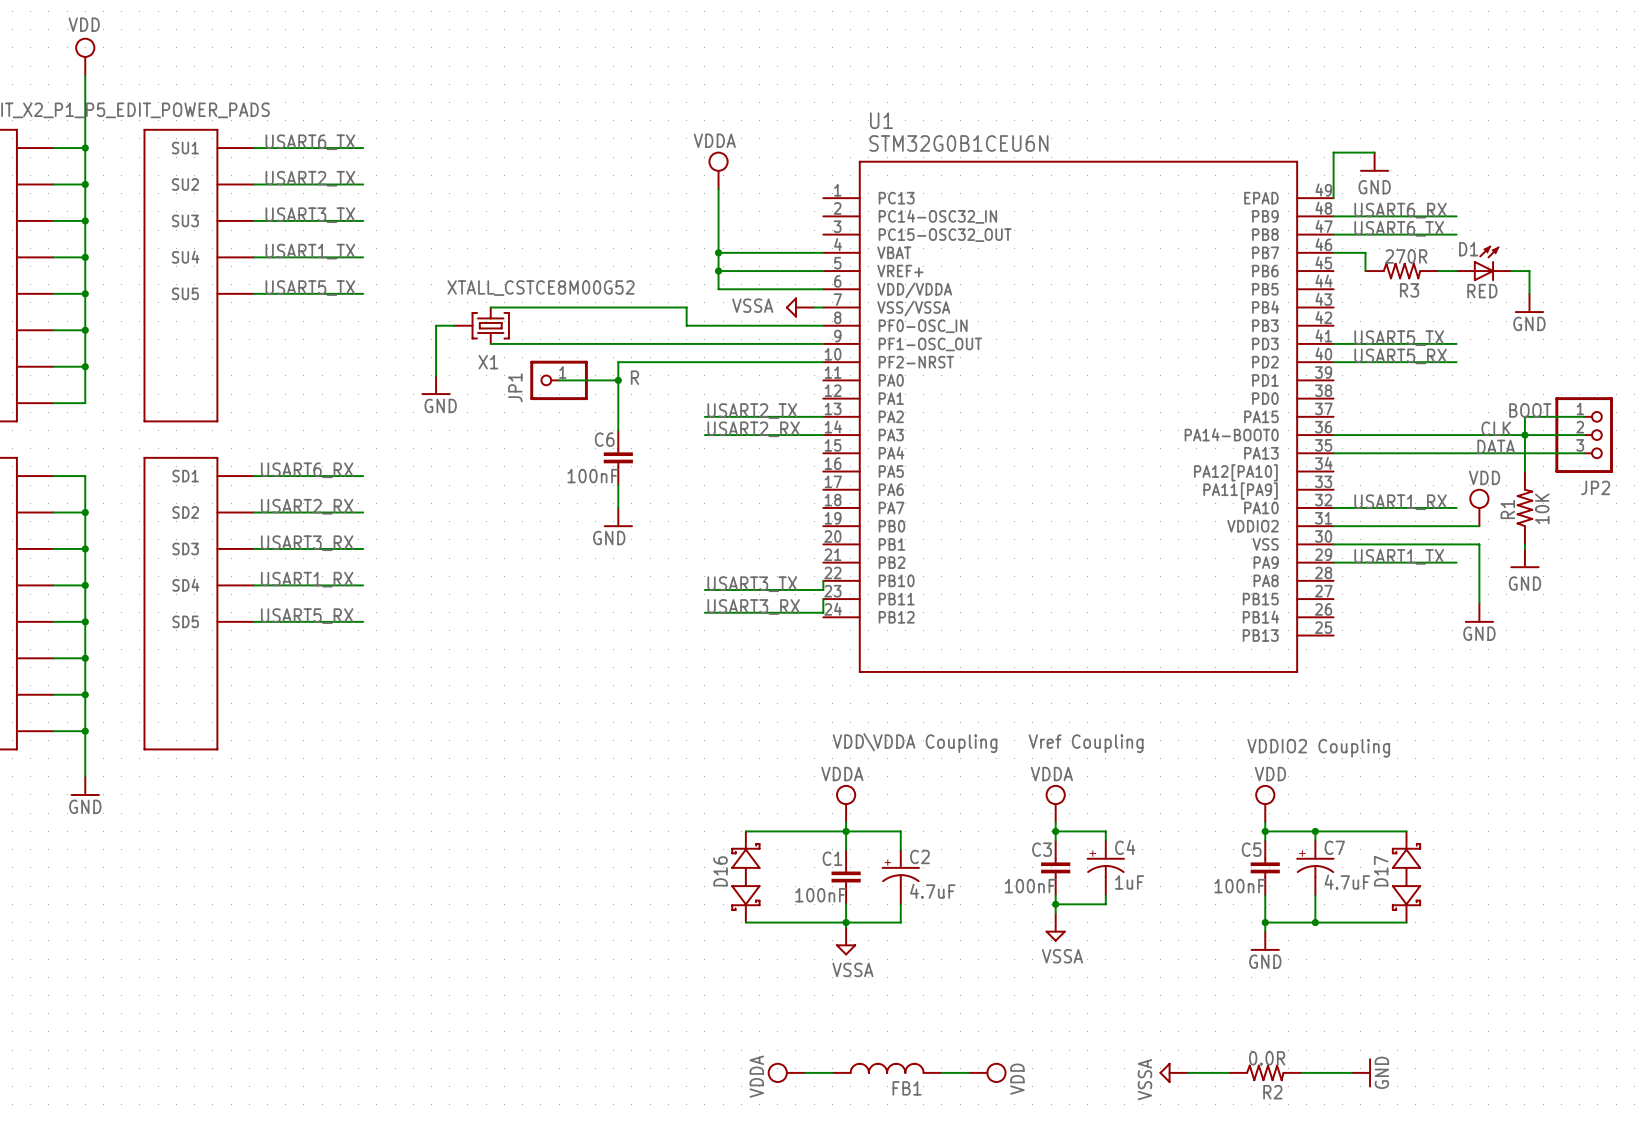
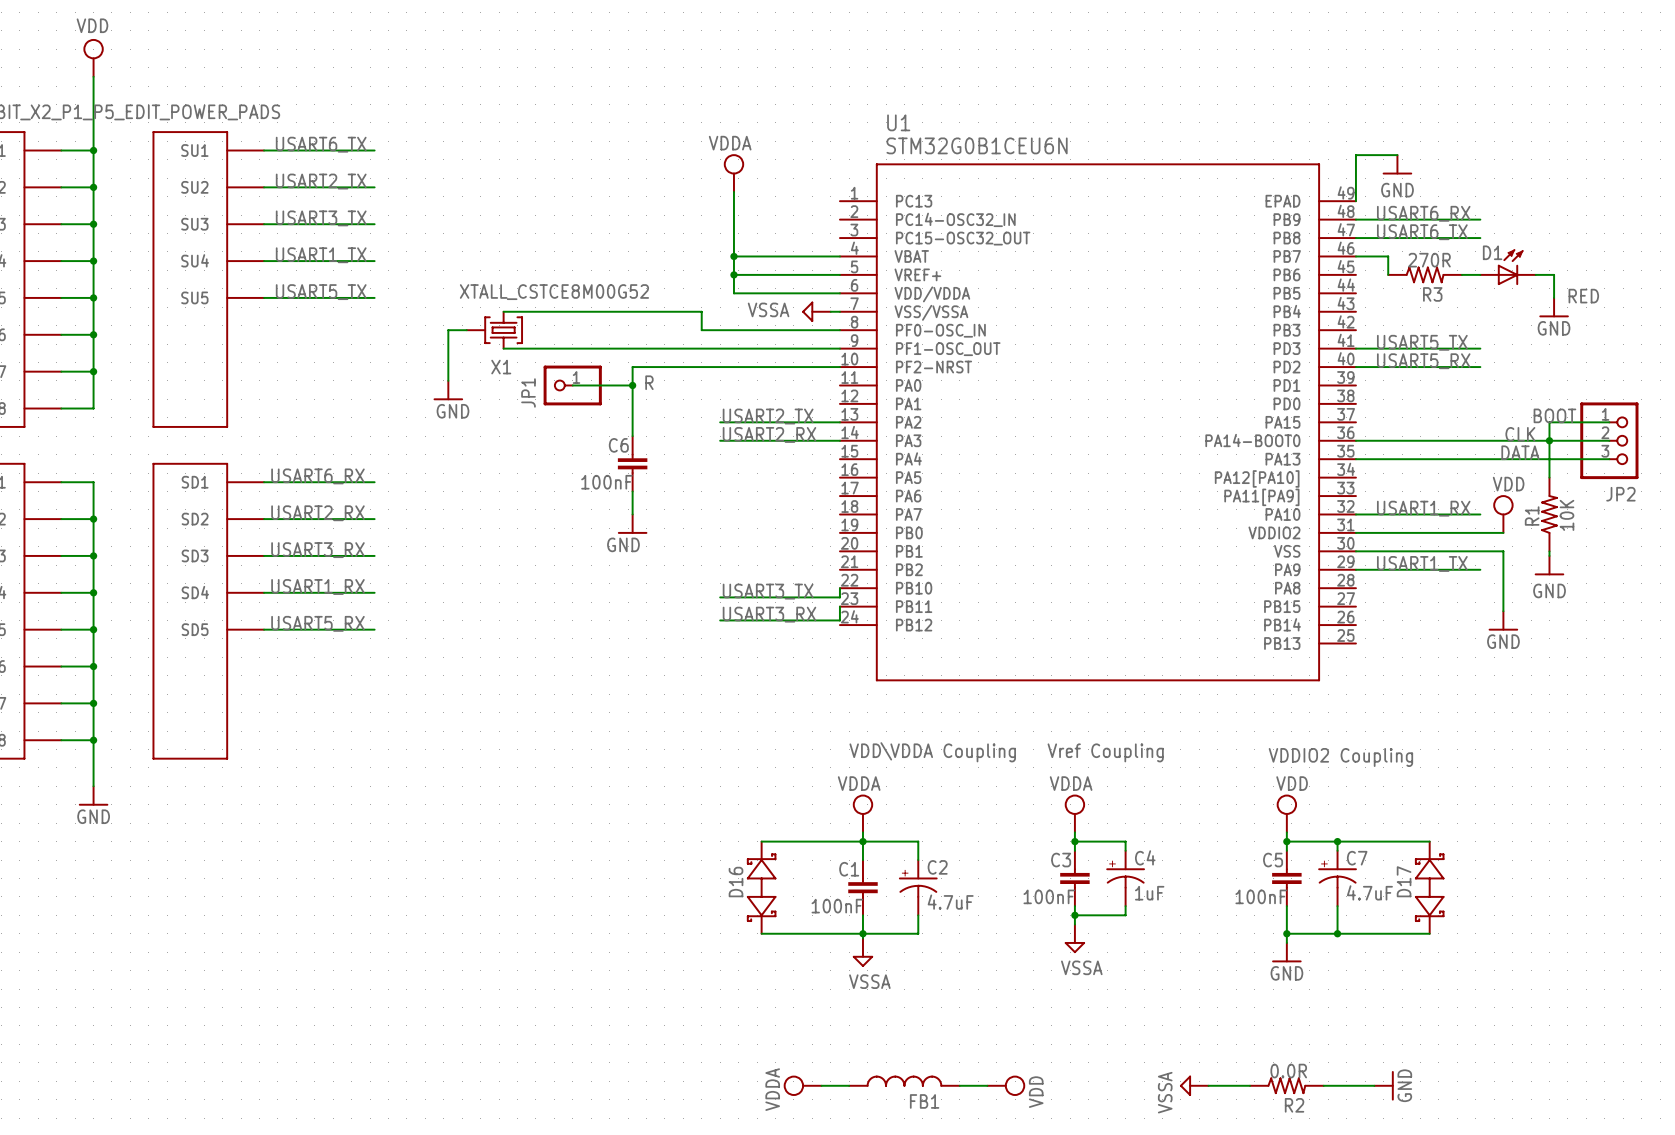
D1 value position: RED (1482, 291) -> RED (1583, 296)

